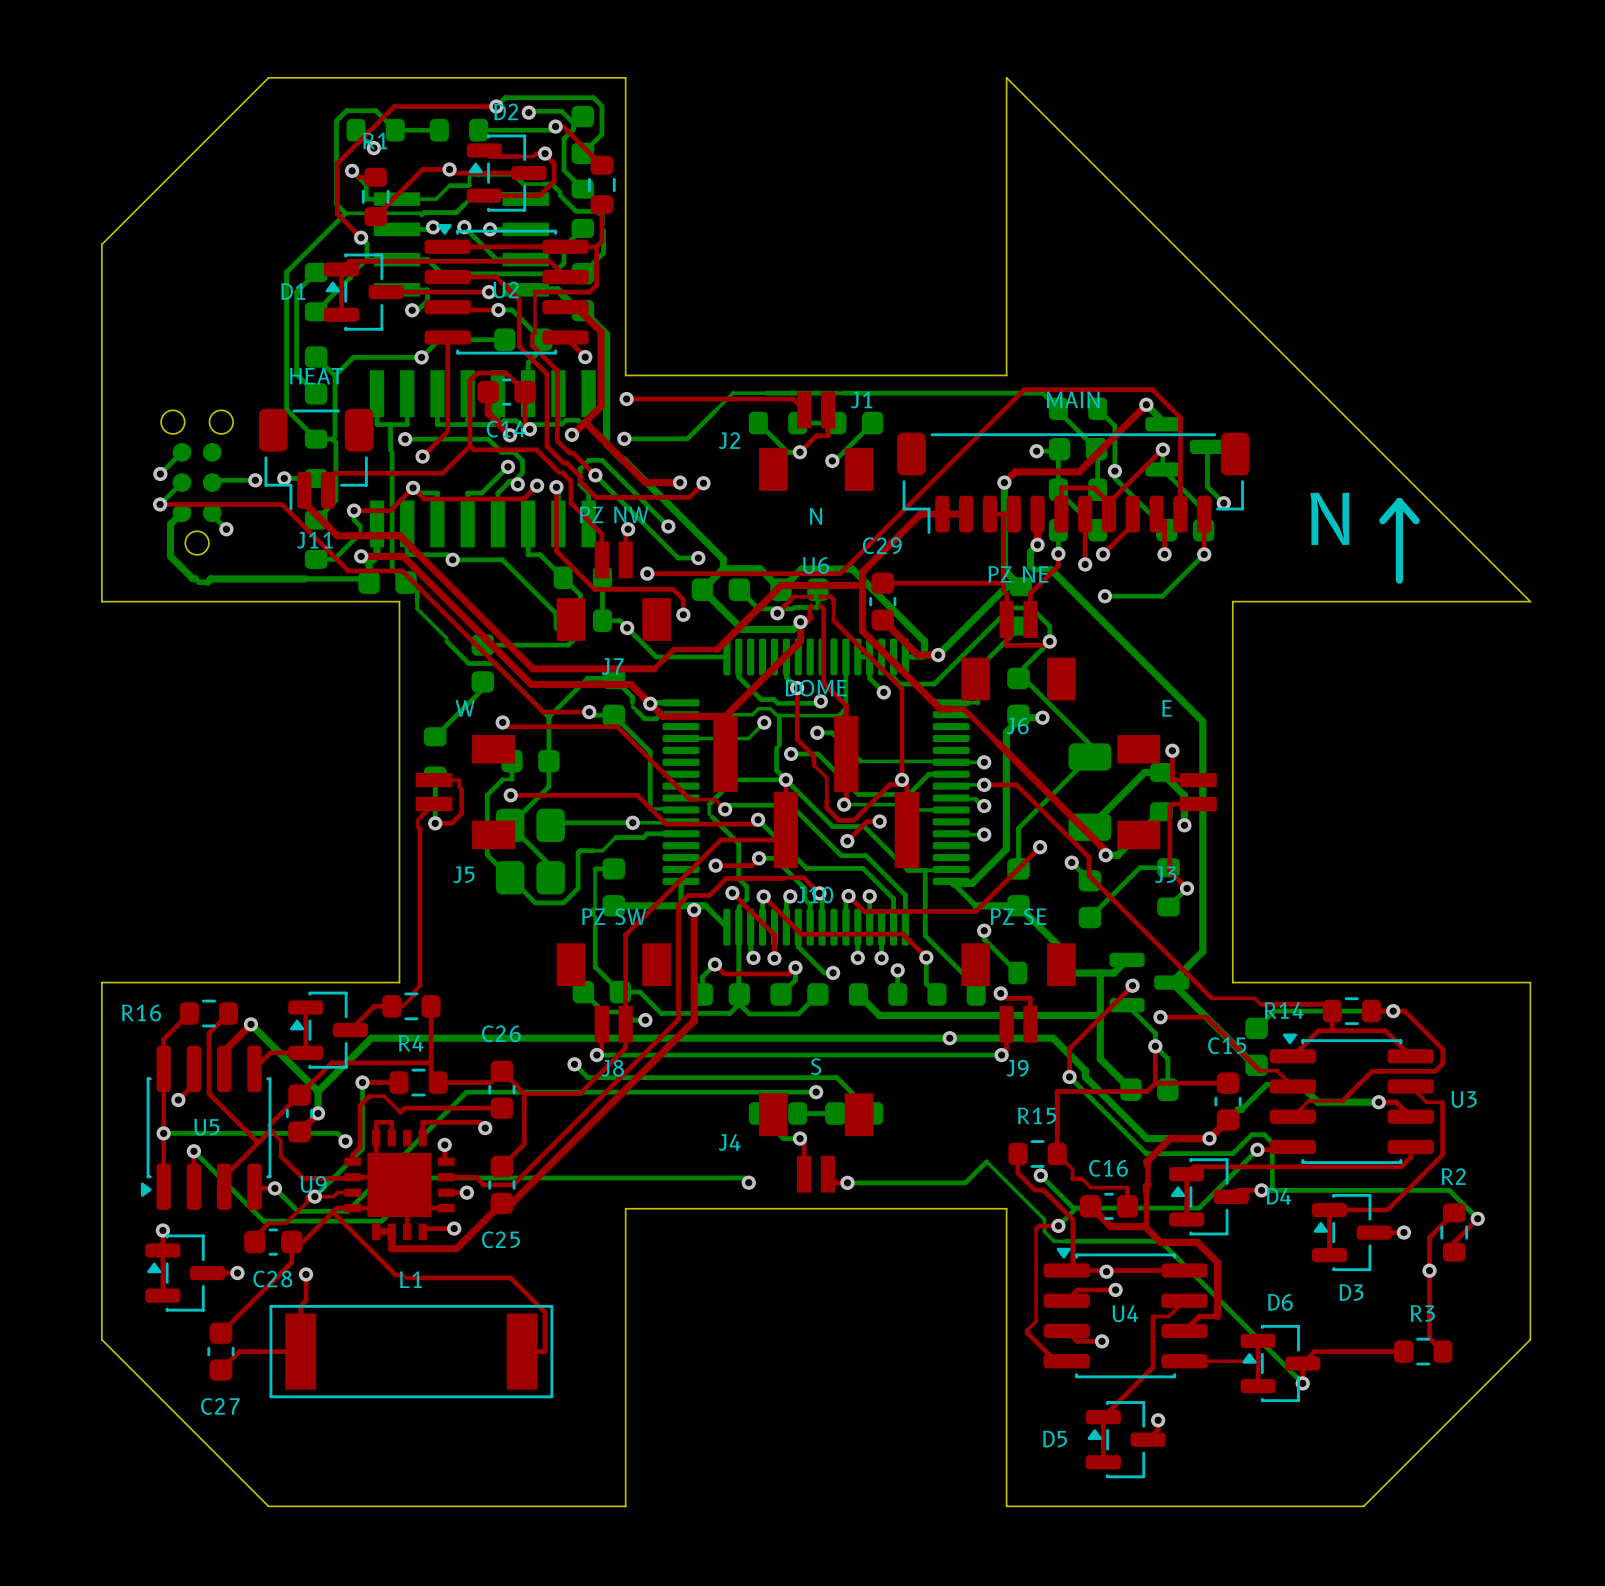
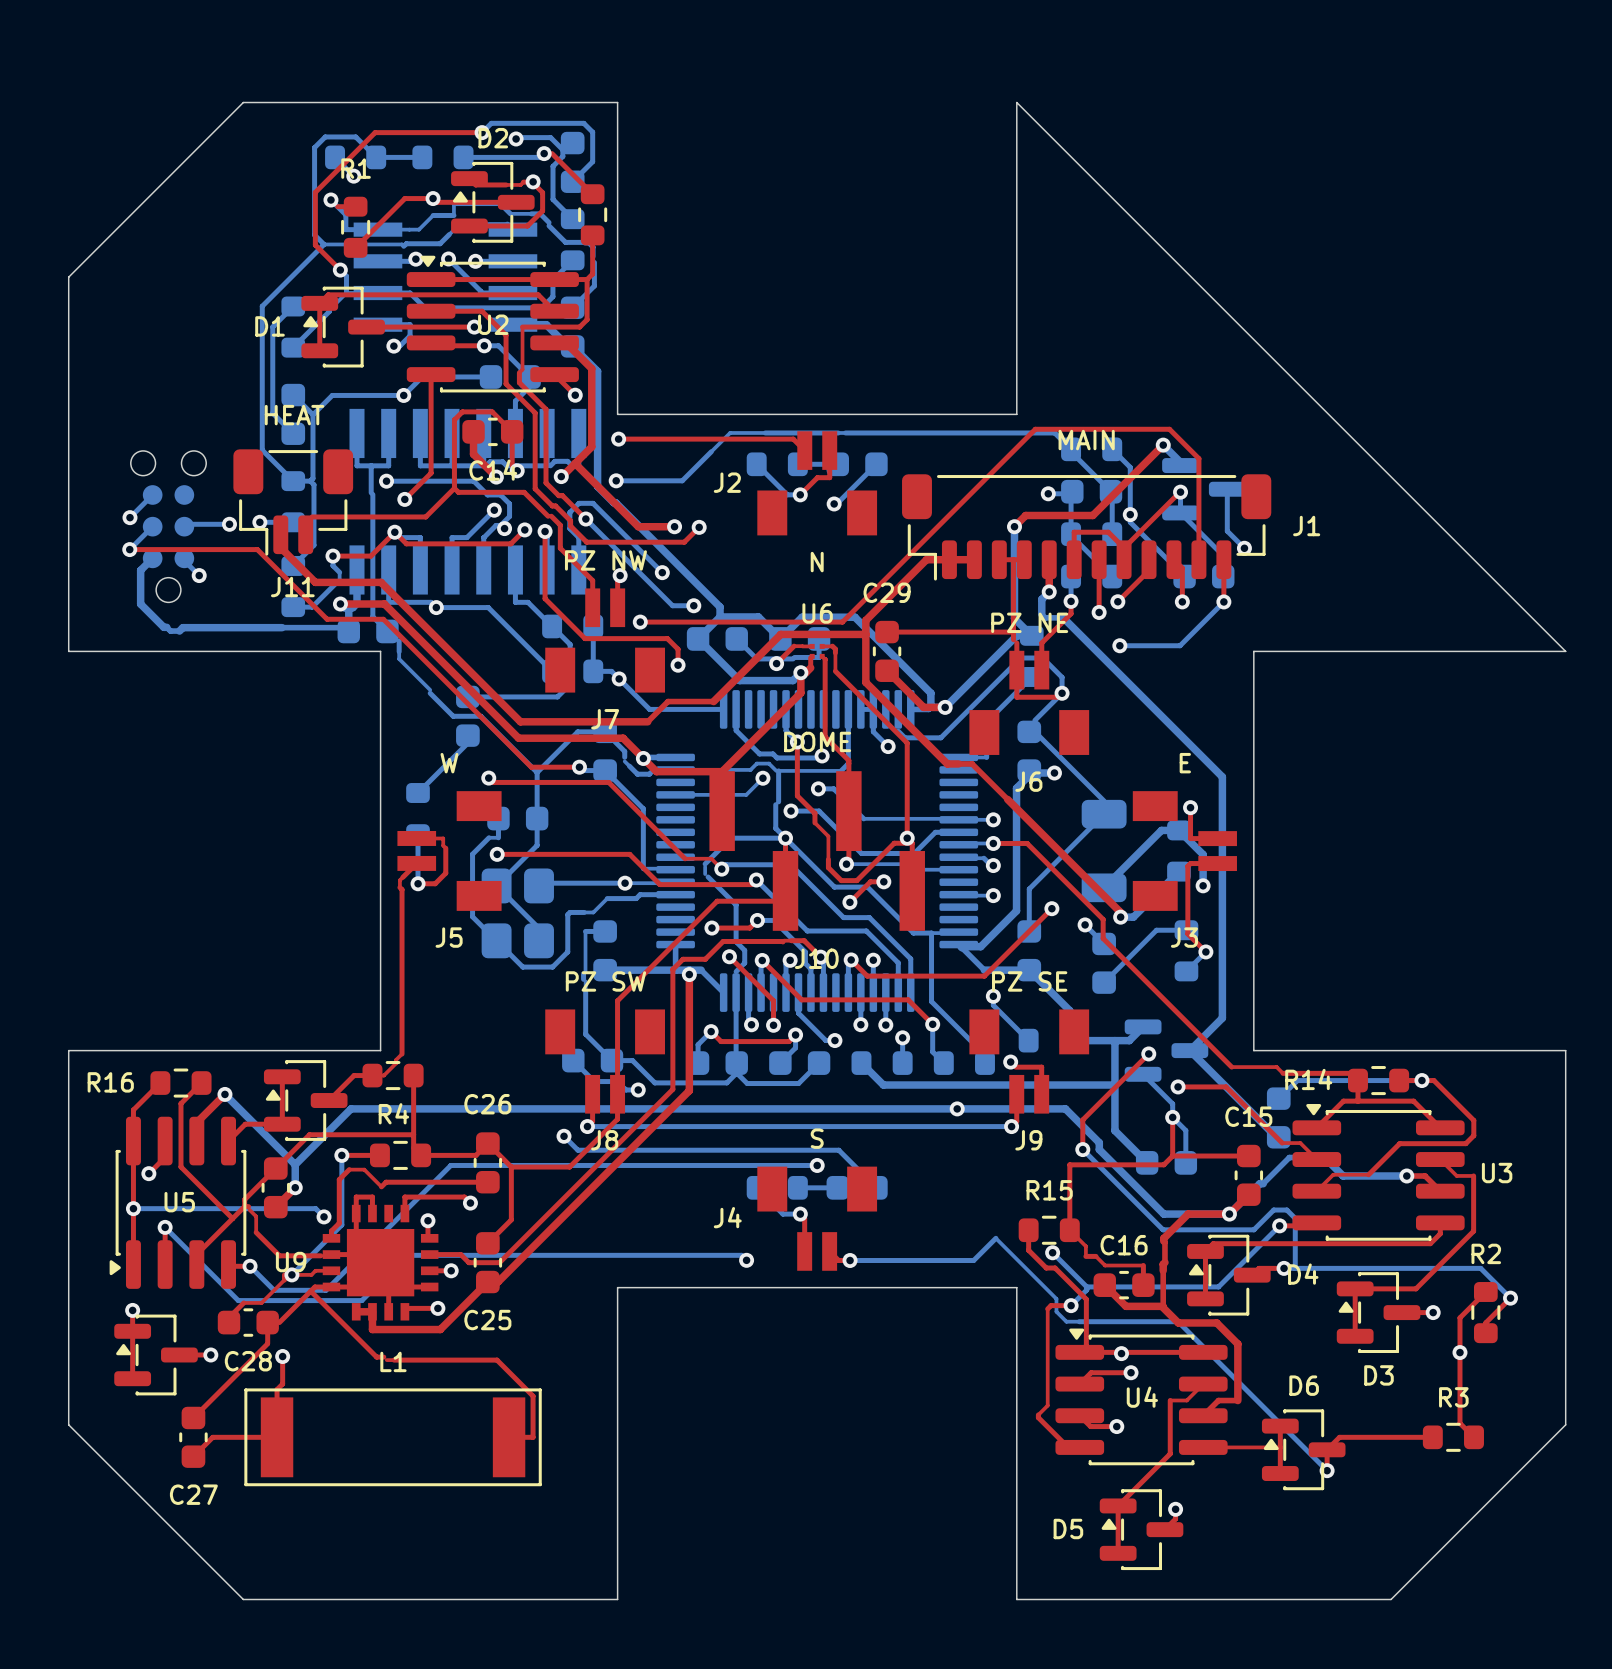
J1 name position: J1 (861, 400) -> J1 (1306, 526)
line: (1399, 501) (1382, 520) -> none
line: (1399, 501) (1416, 520) -> none
line: (1399, 501) (1399, 580) -> none
text: N (1329, 518) -> none

